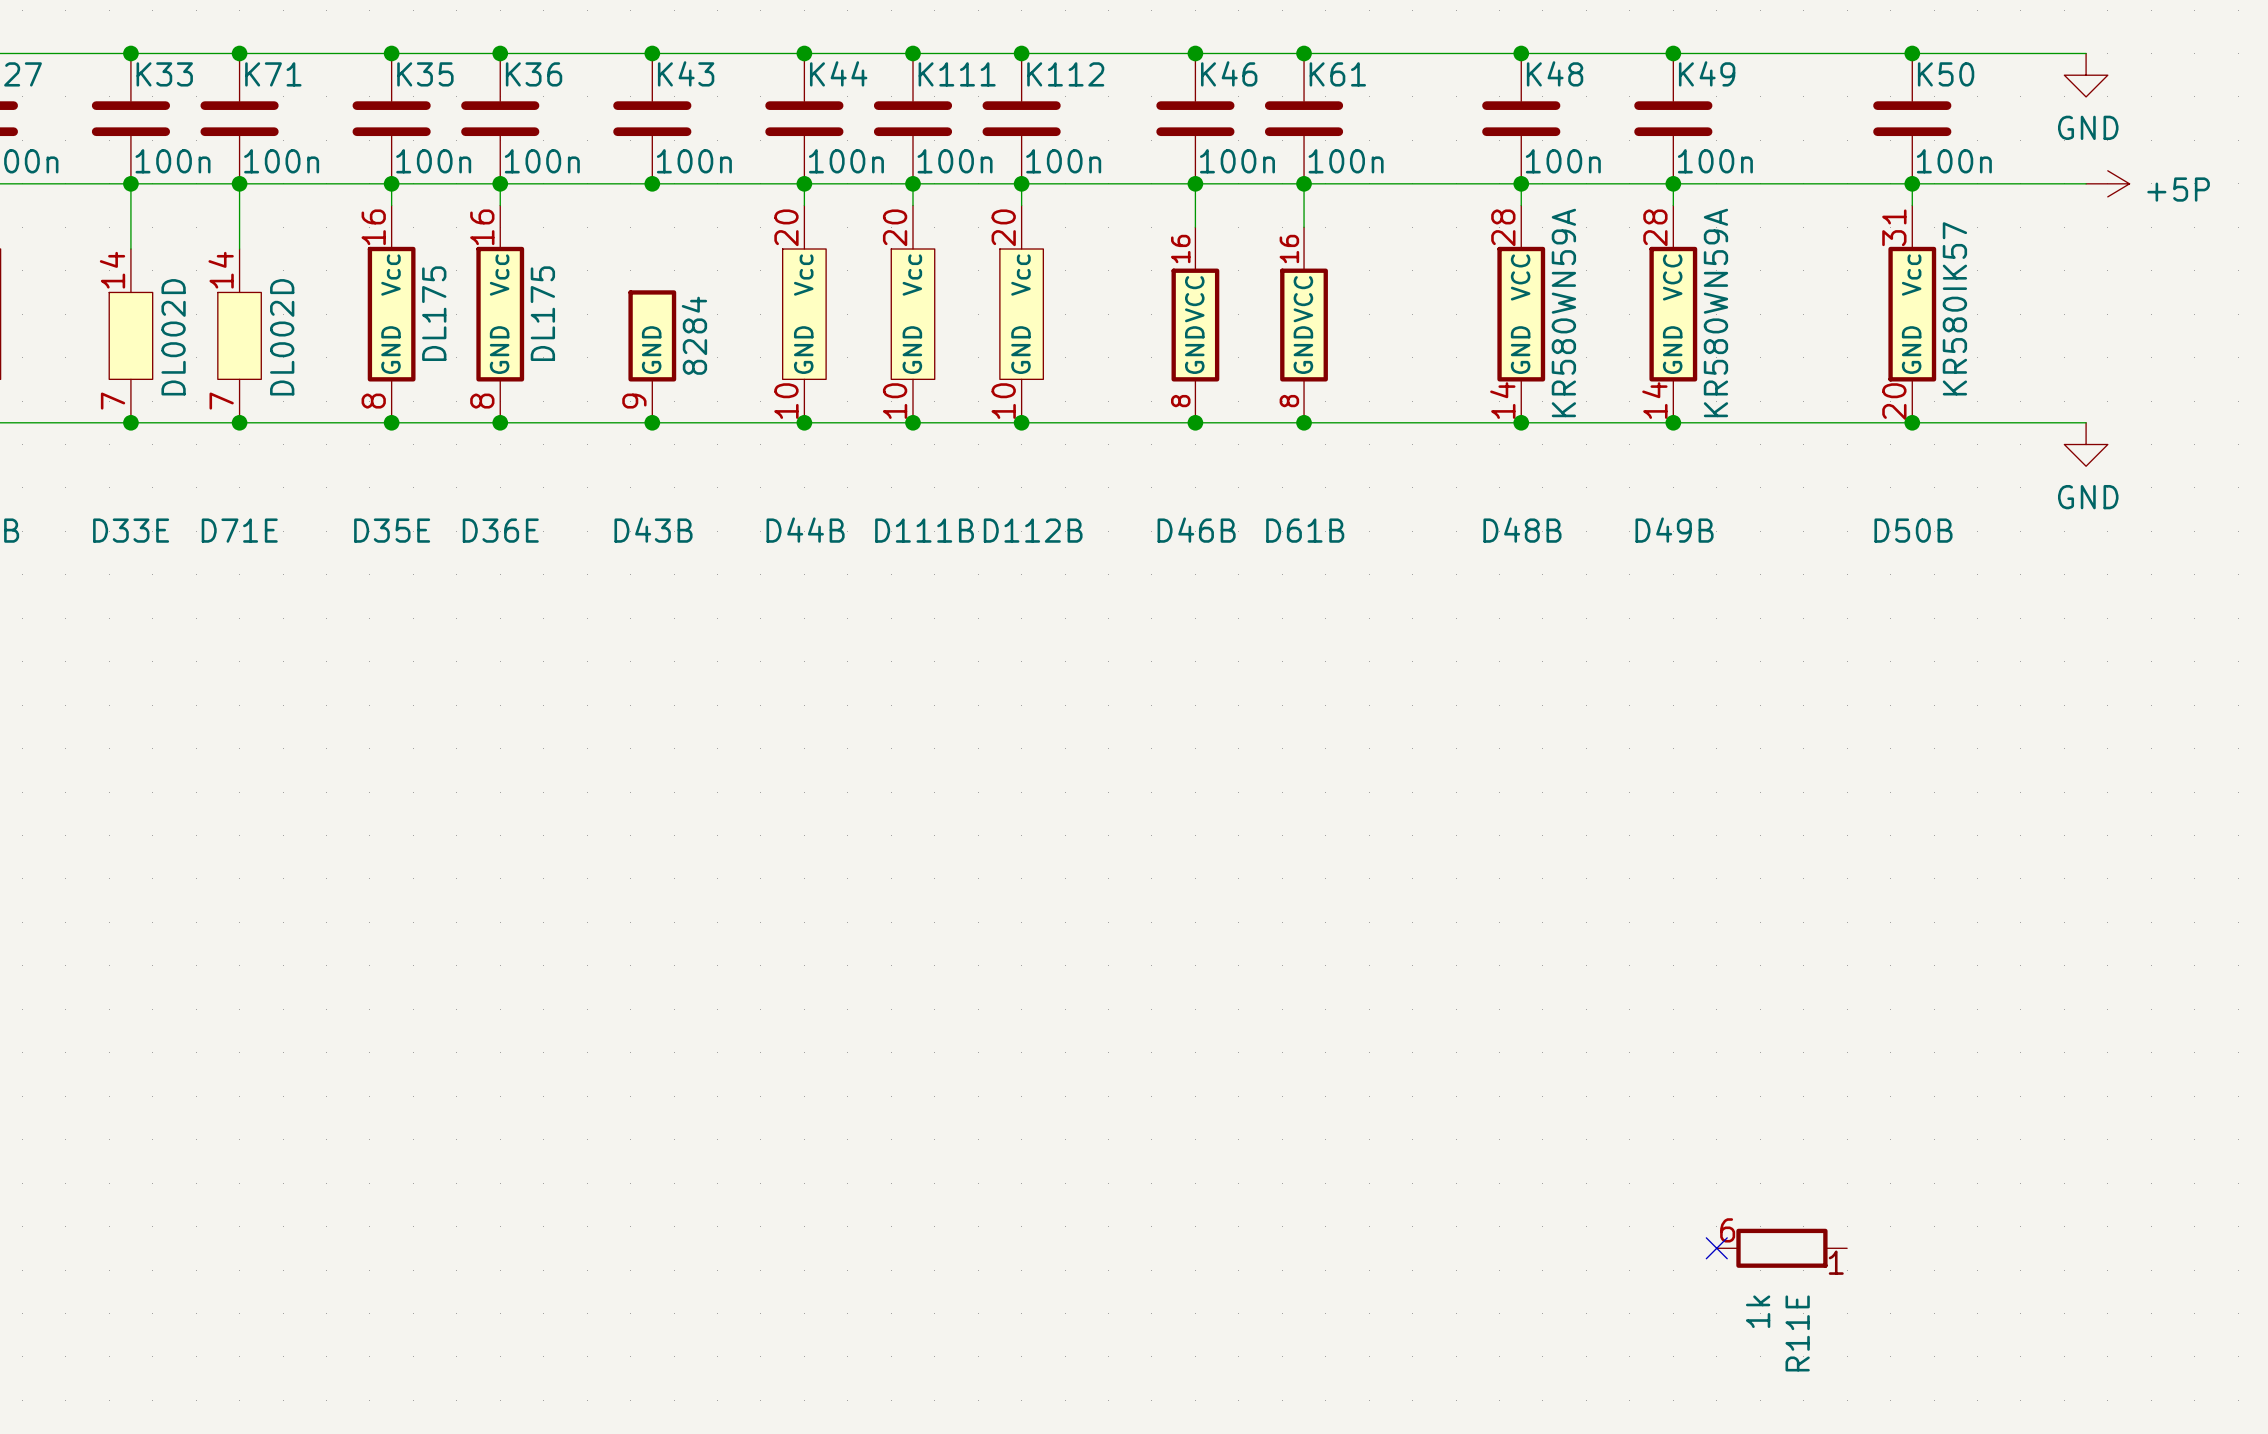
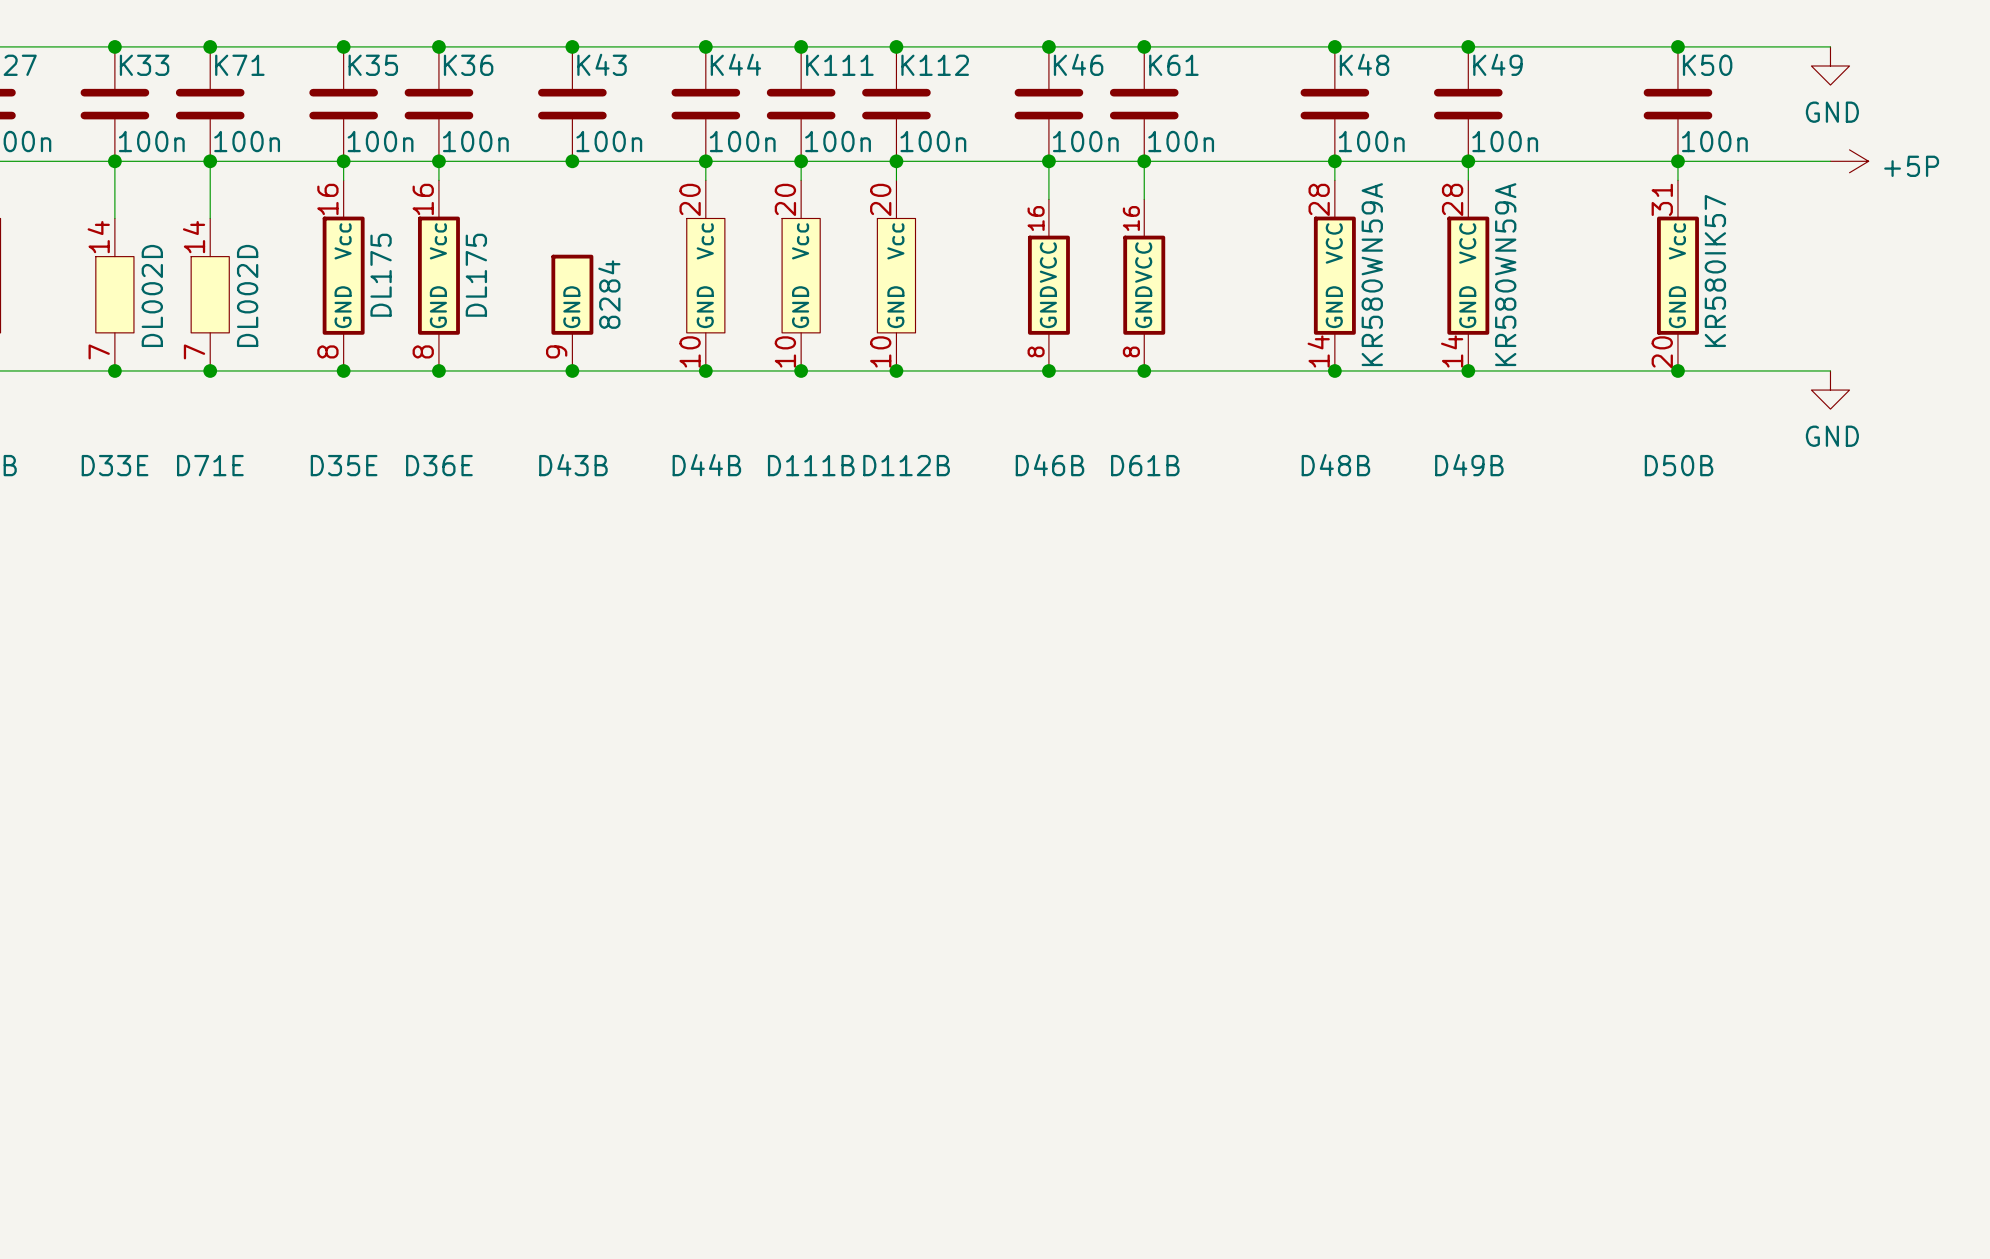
no-connect mark: (1716, 1248) -> none
R11E: 1k (1781, 1248) -> none

